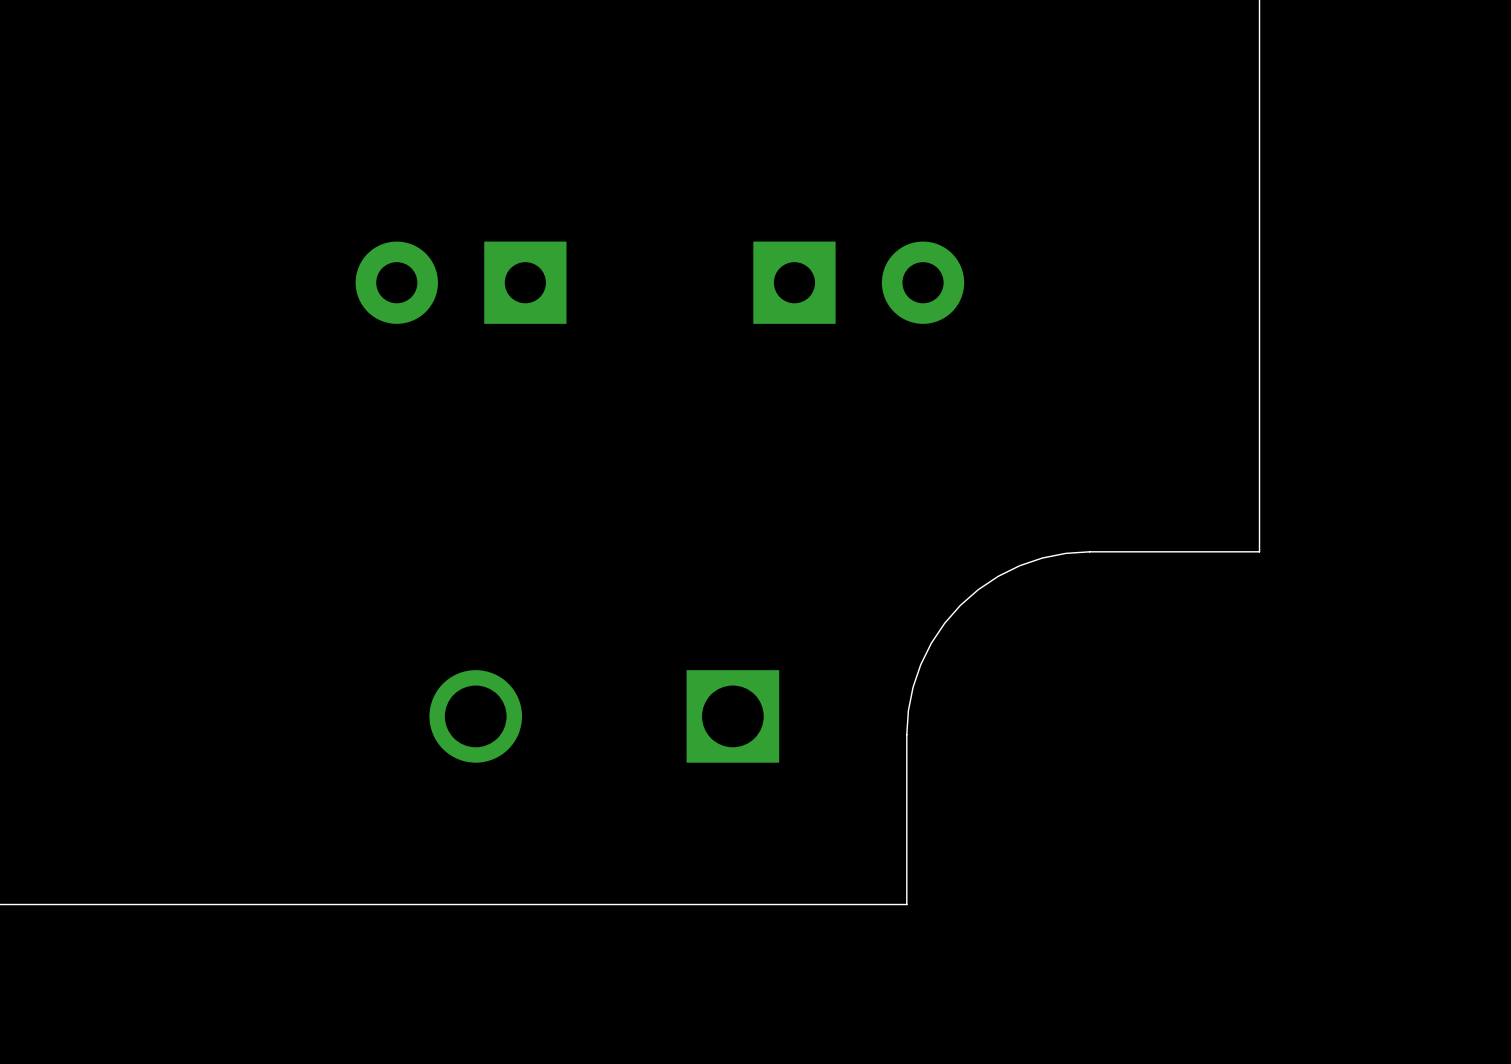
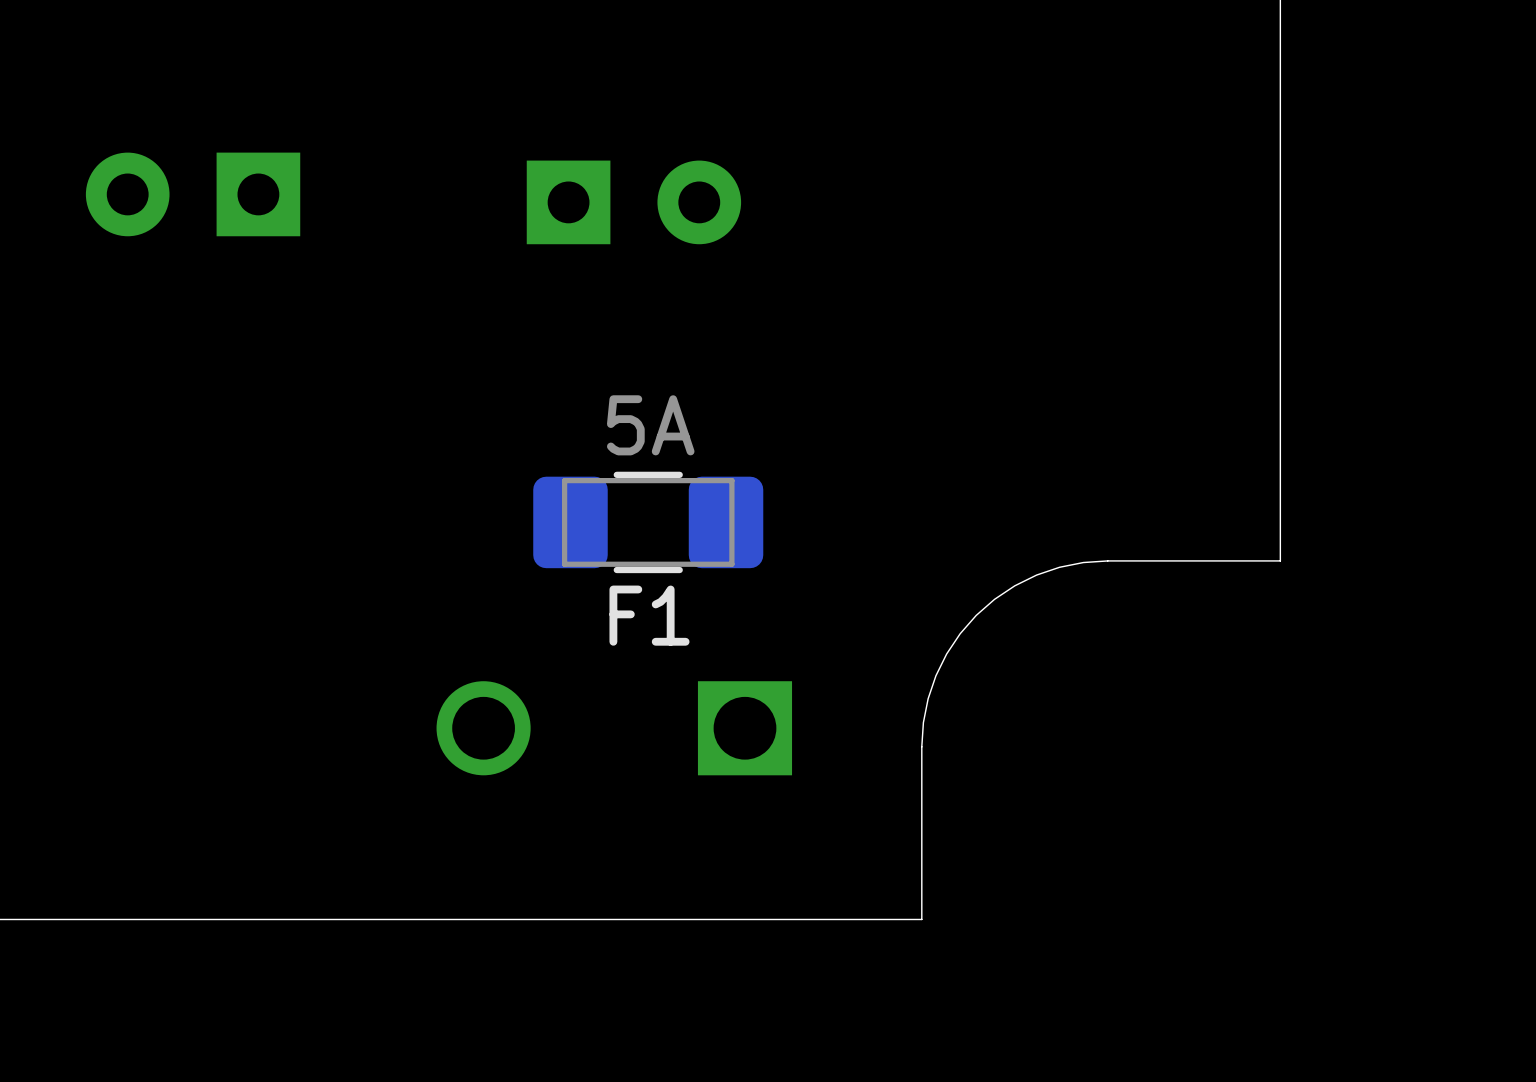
part: none -> (193, 194)
part: none -> (633, 202)
part: (461, 282) -> none
part: (858, 282) -> none
F1: none -> 5A (648, 522)

